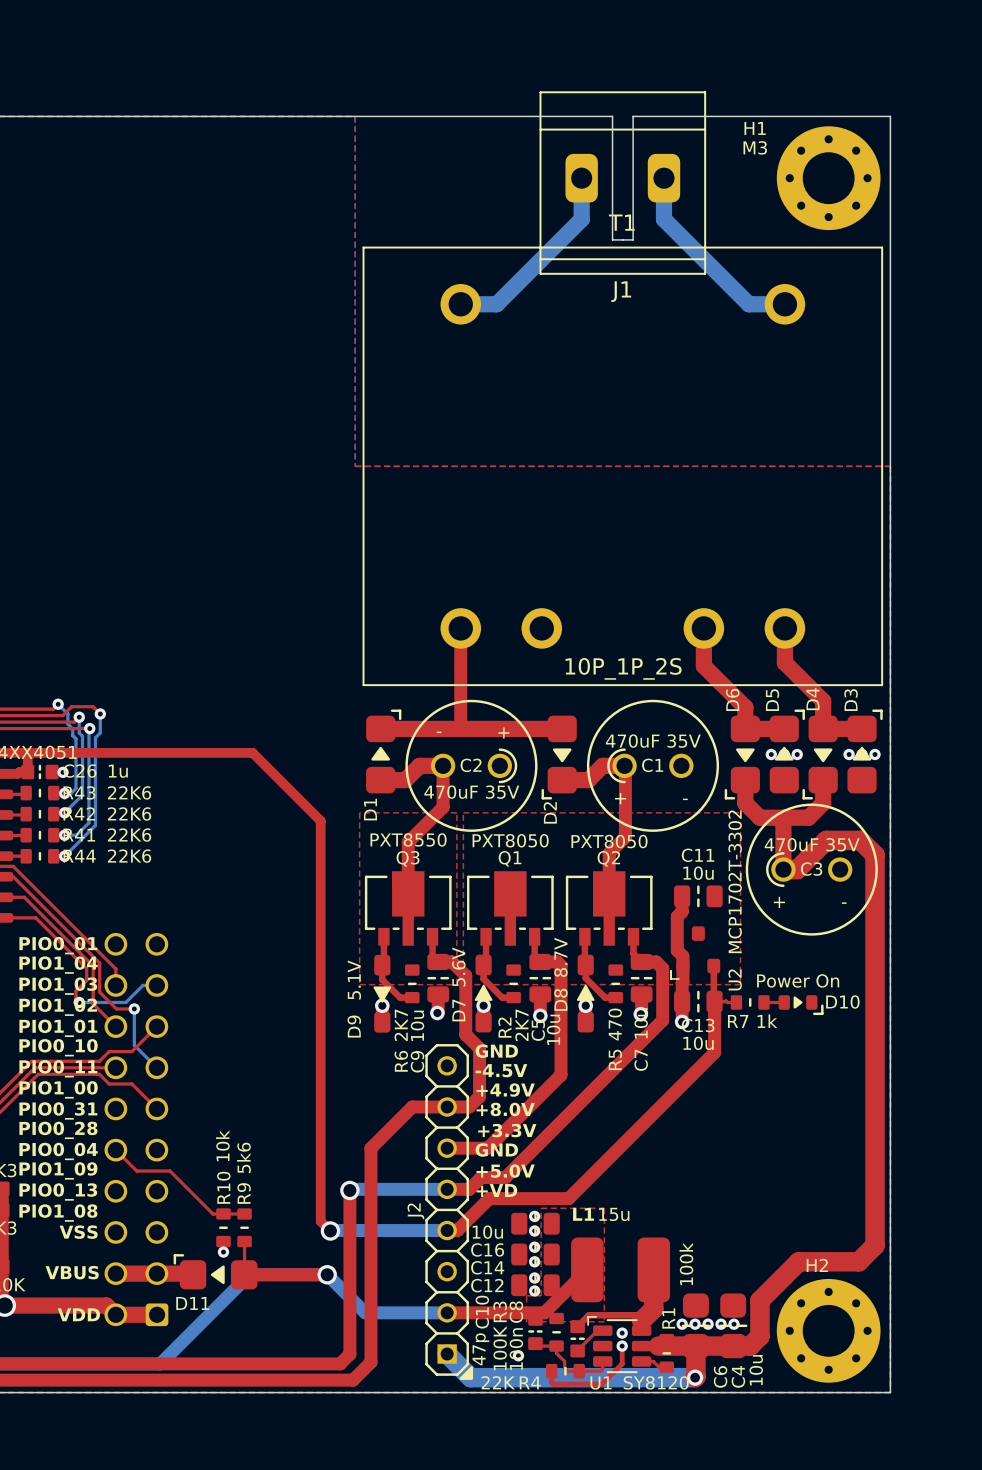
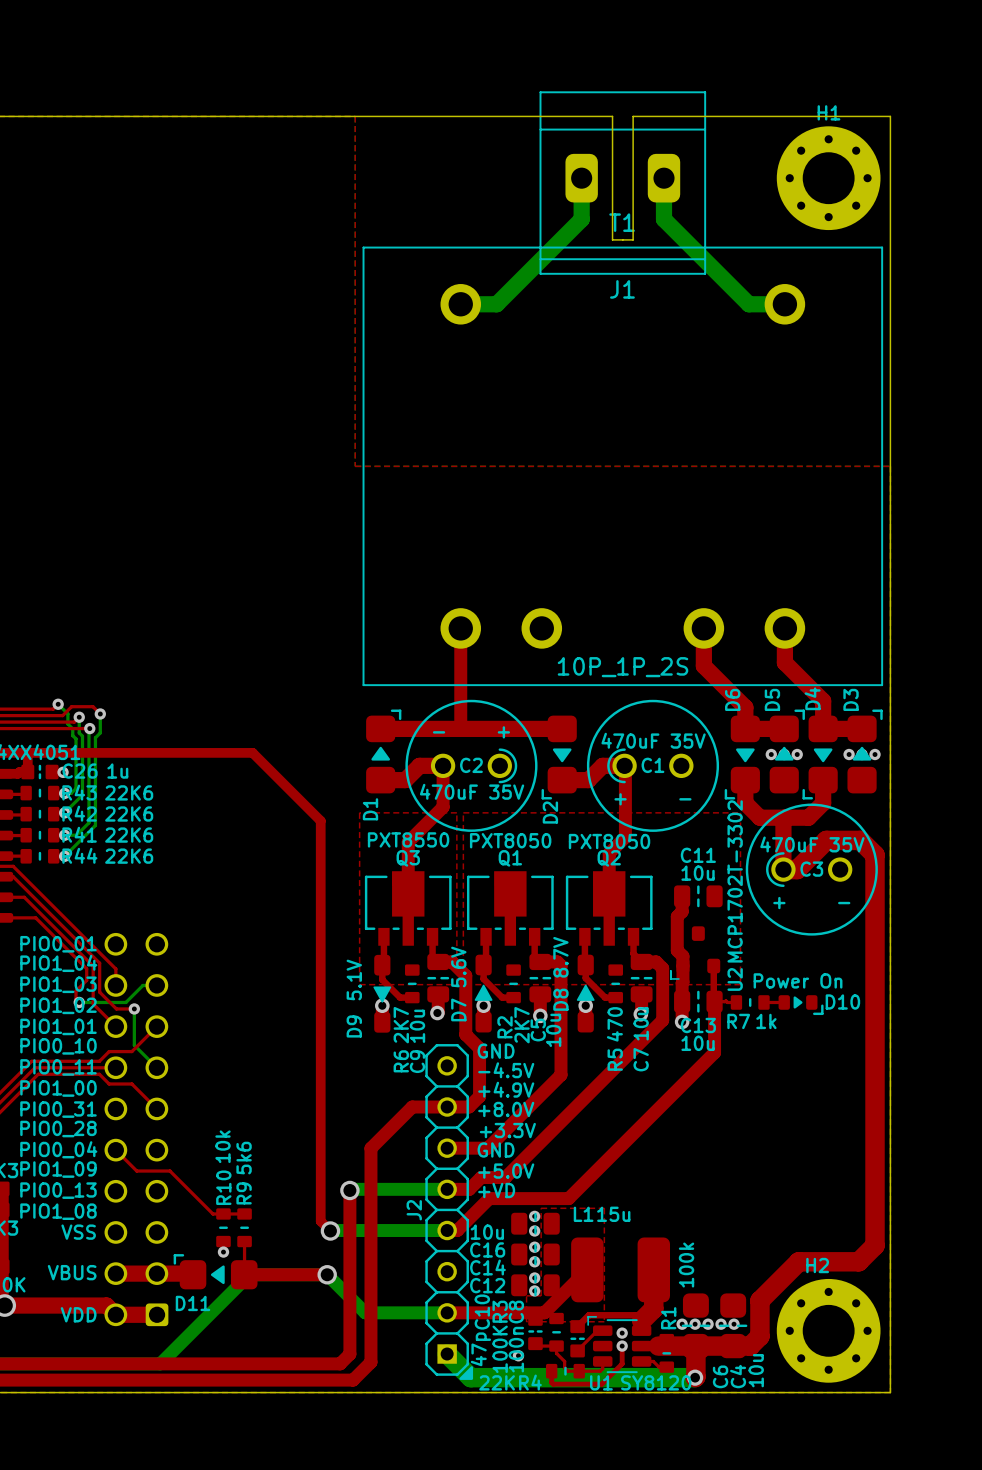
H1 name position: H1 (755, 128) -> H1 (828, 112)
H1 value: M3 (755, 147) -> none

